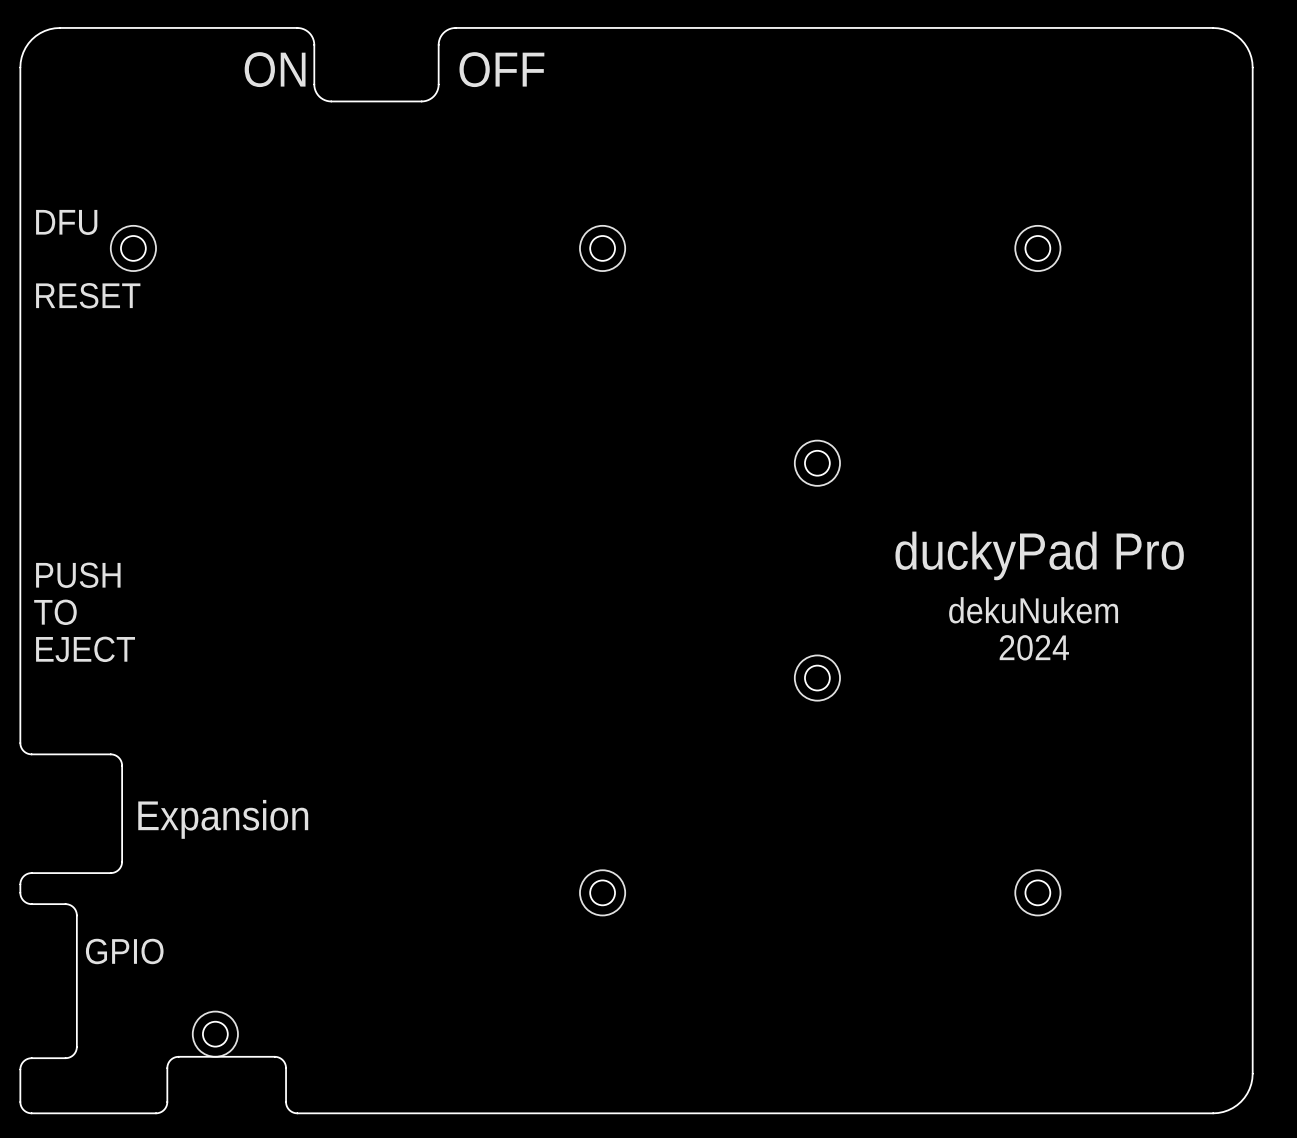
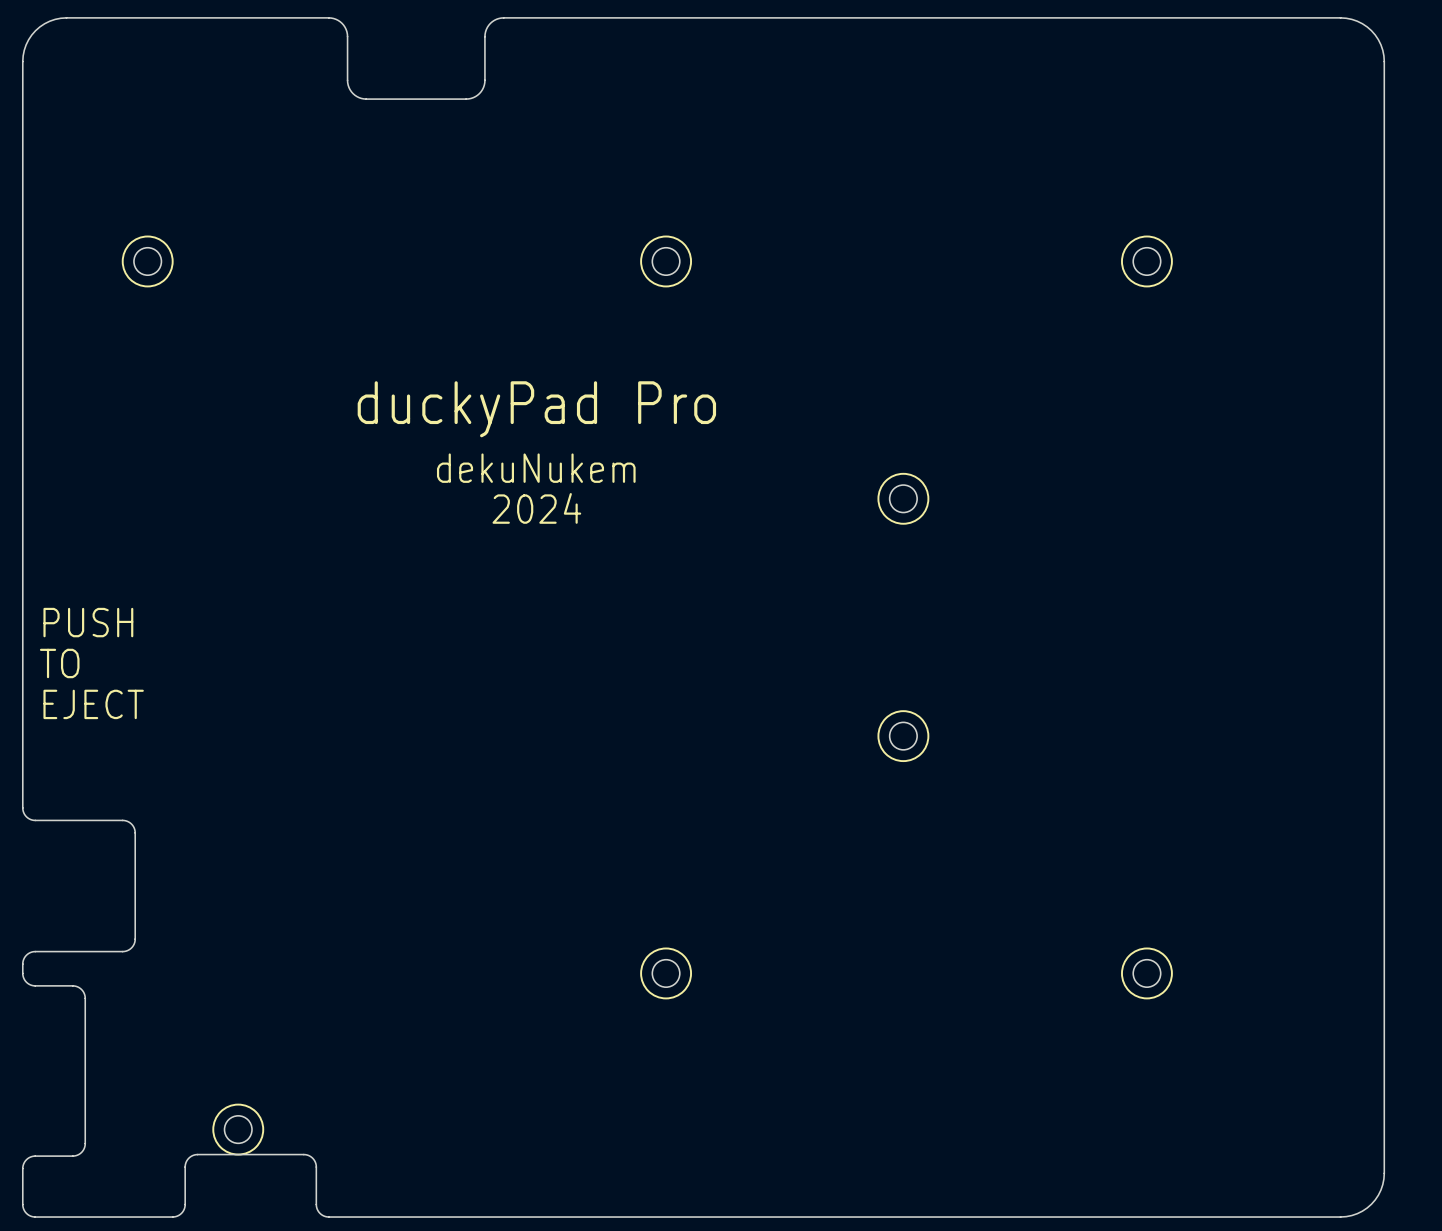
text: ON (275, 69) -> none
text: OFF (501, 69) -> none
text: DFU (66, 222) -> none
text: RESET (88, 295) -> none
text: none -> duckyPad Pro (536, 409)
text: none -> dekuNukem (536, 468)
text: none -> 2024 (536, 508)
text: duckyPad Pro (1039, 555) -> none
text: dekuNukem (1033, 610) -> none
text: 2024 (1034, 647) -> none
text: Expansion (223, 819) -> none
text: GPIO (124, 951) -> none

